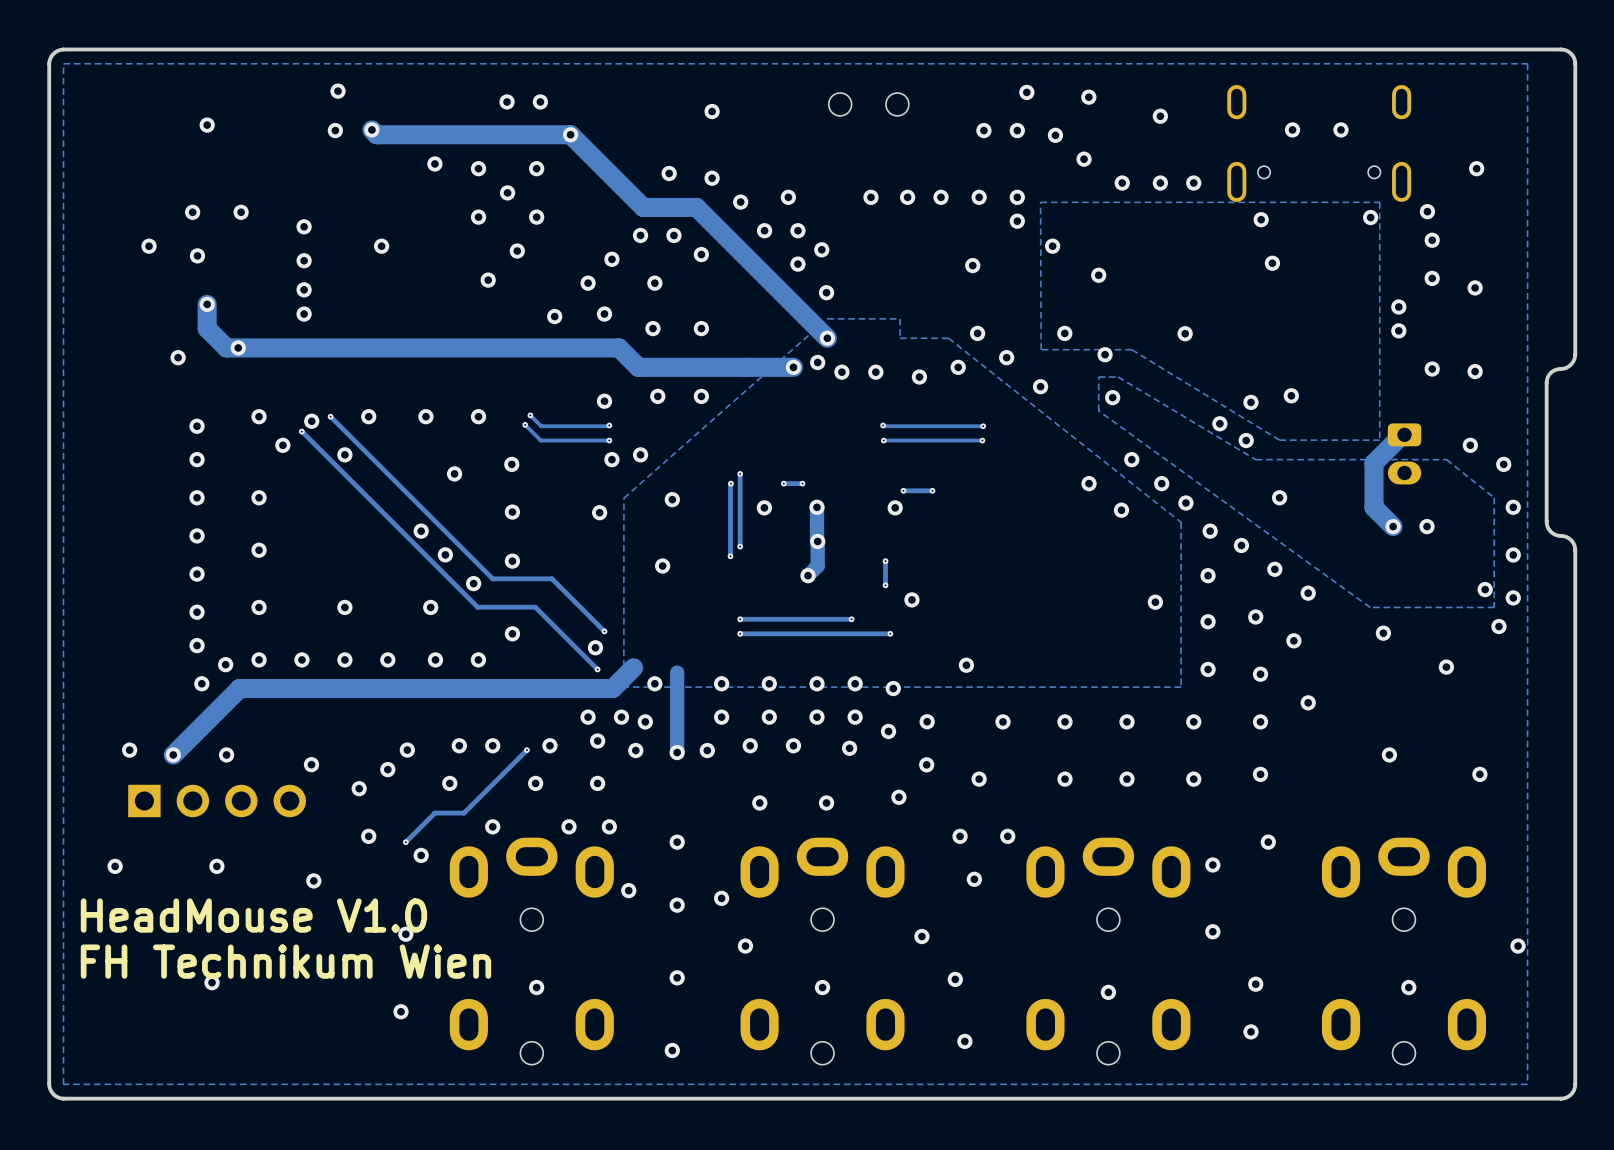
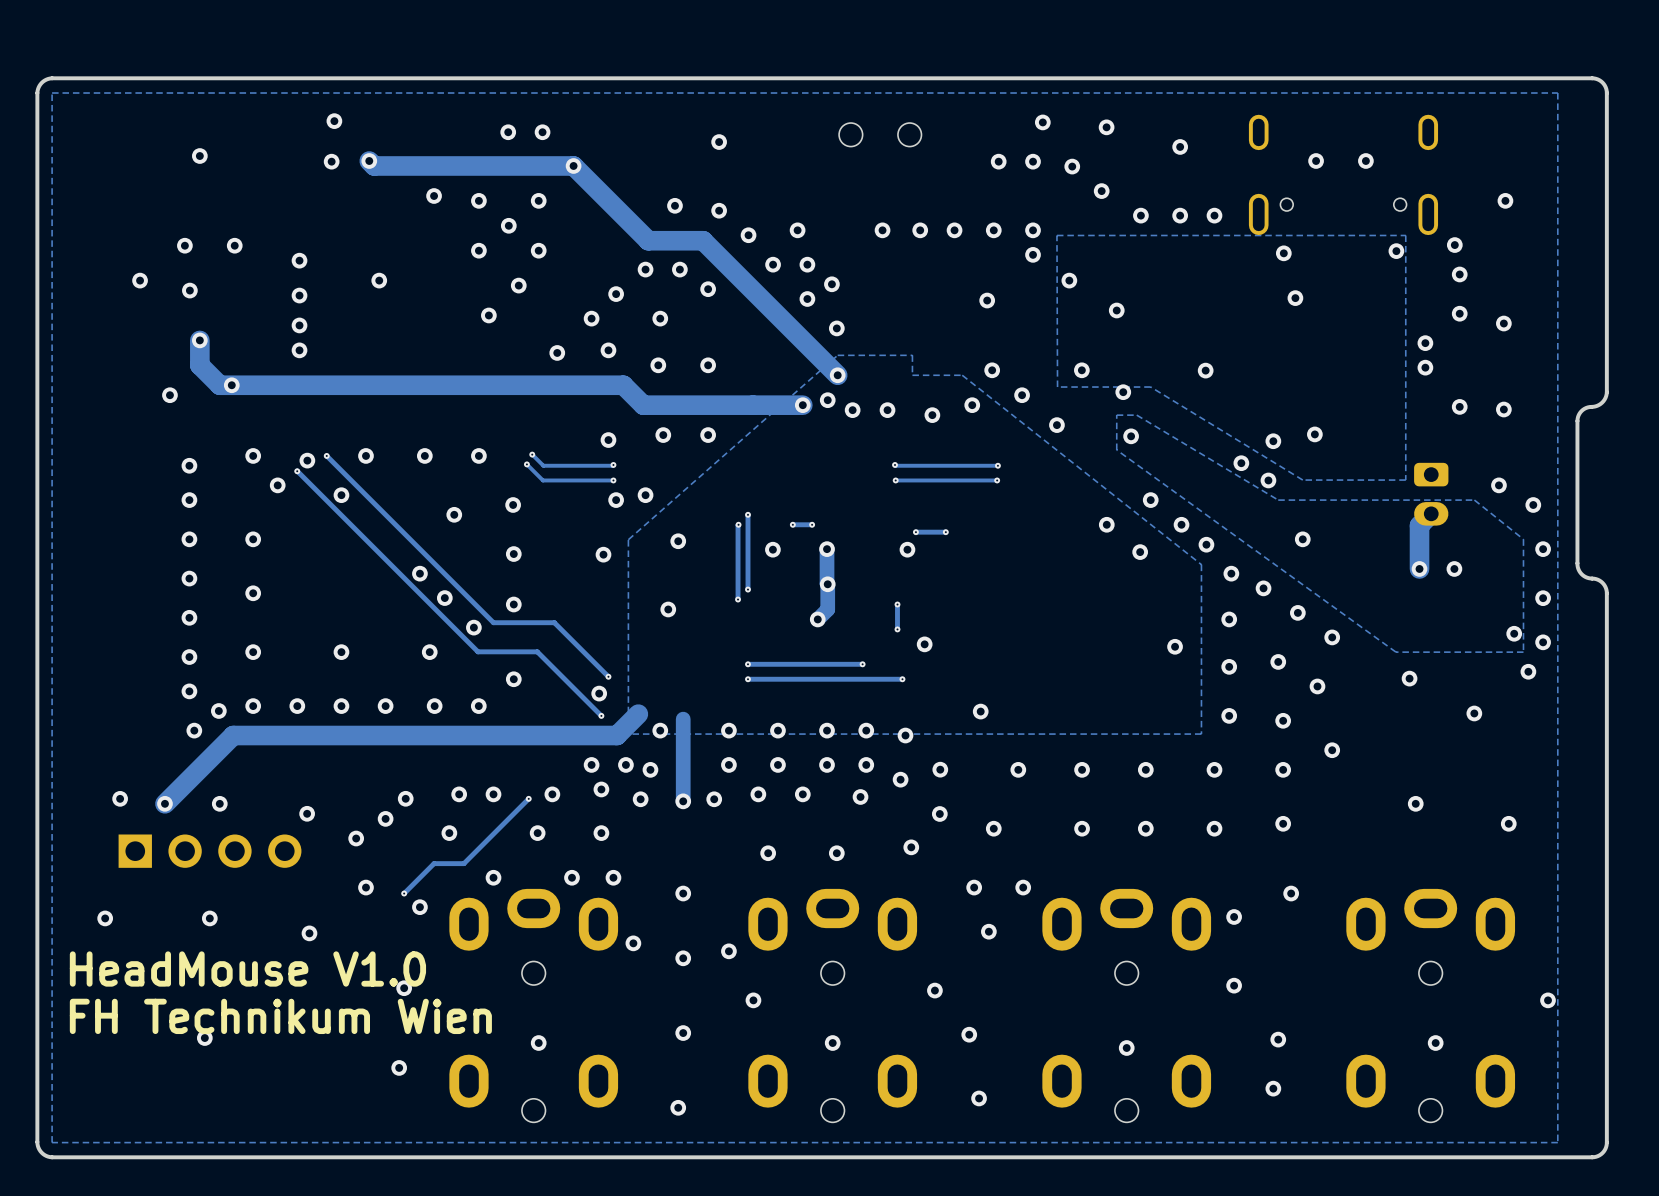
track: (1404, 434) (1374, 463) (1374, 507) (1393, 526) -> (1431, 513) (1419, 525) (1419, 568)

